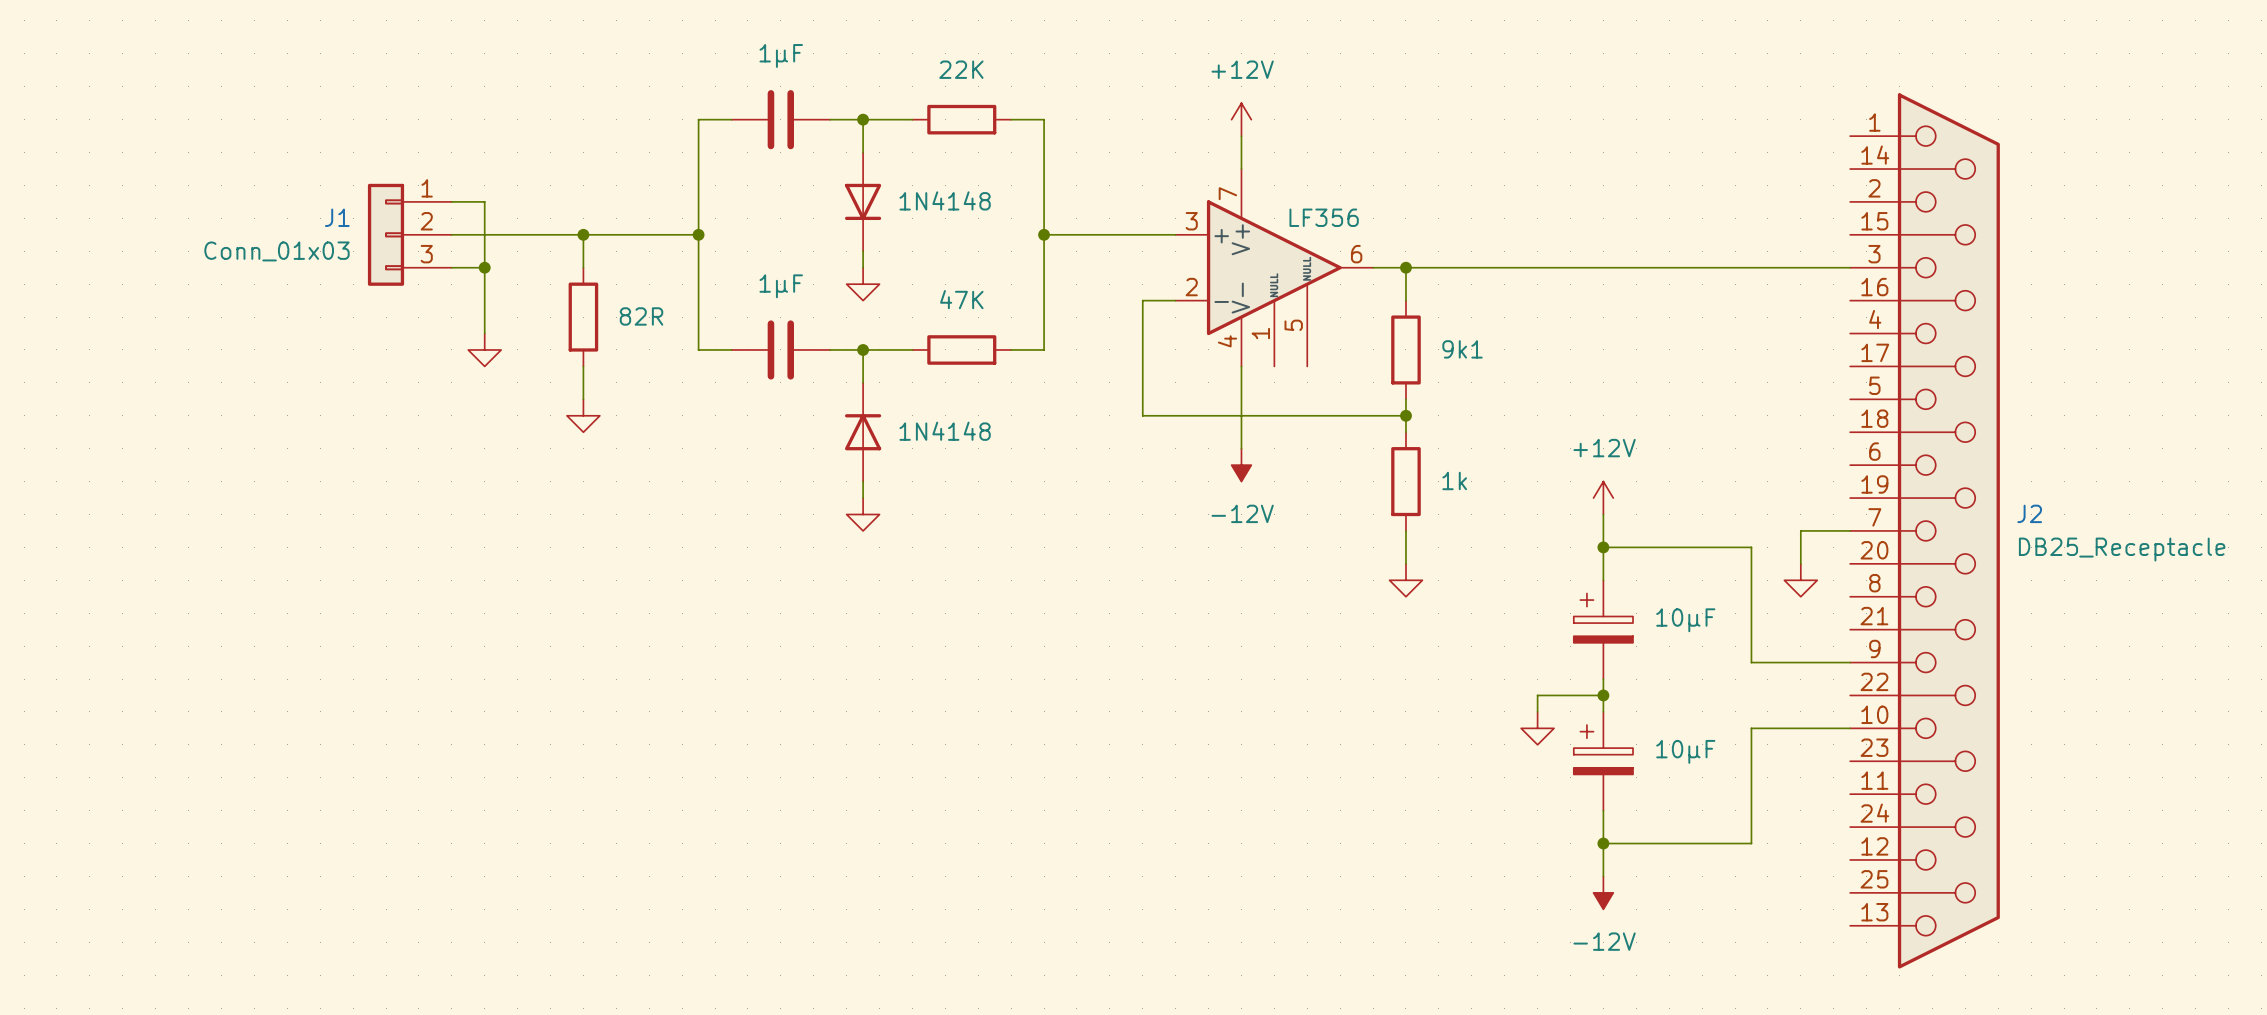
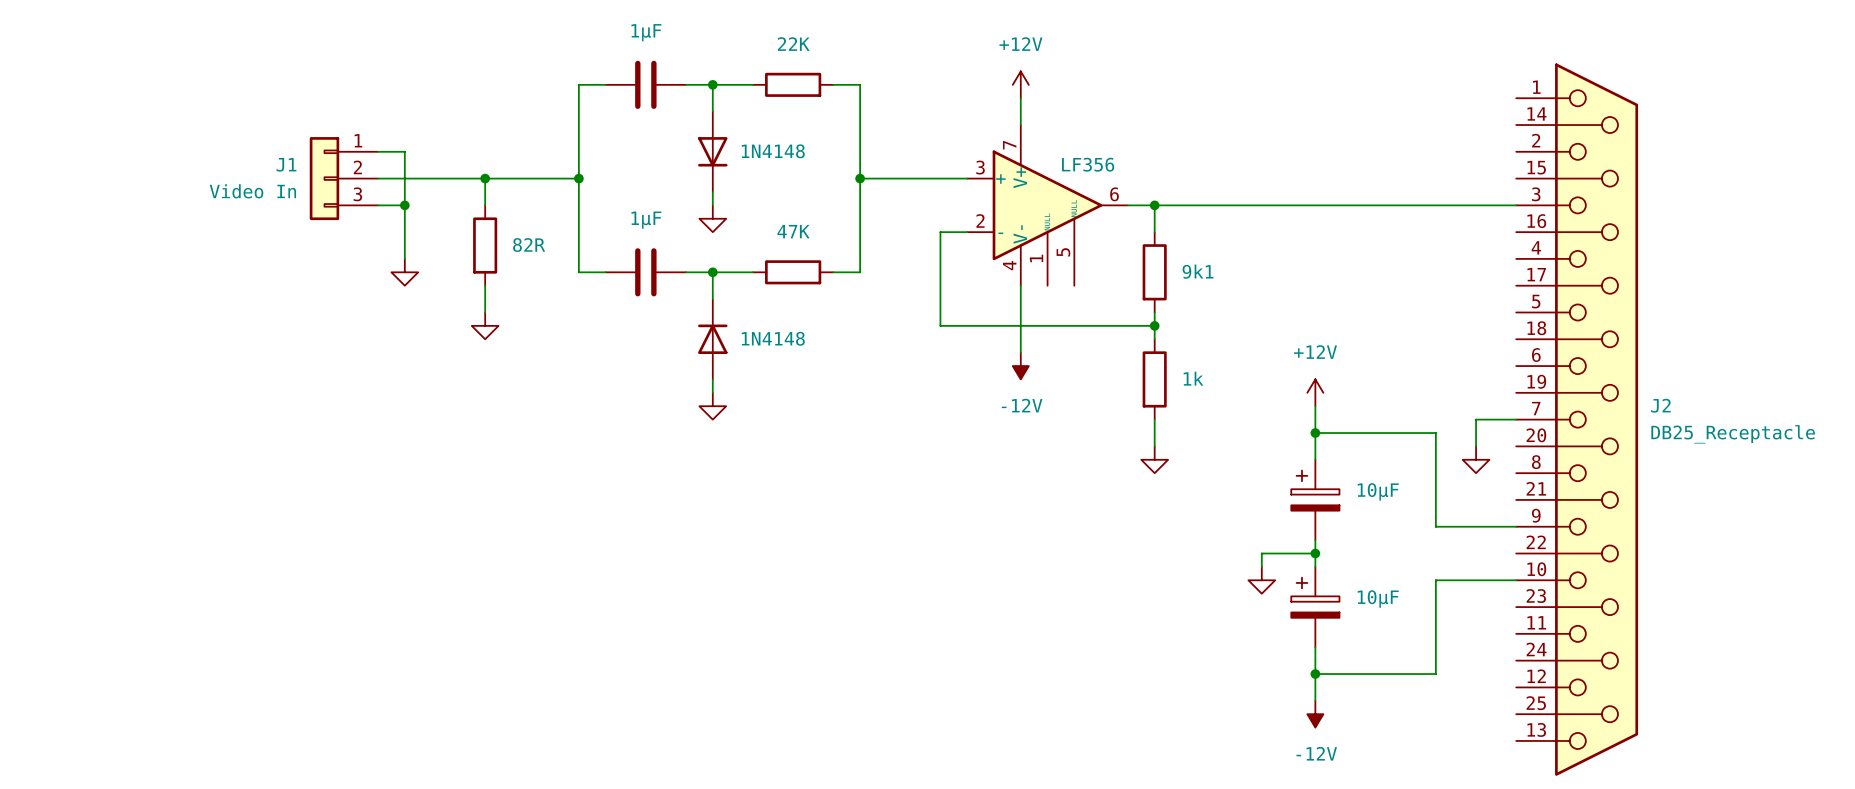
J1 value: Conn_01x03 (276, 251) -> Video In (252, 191)

